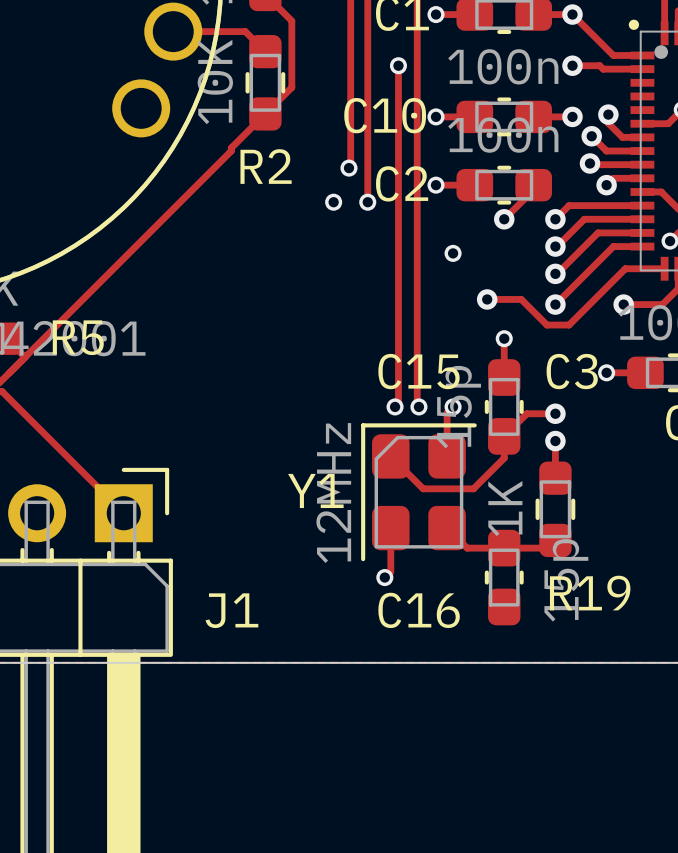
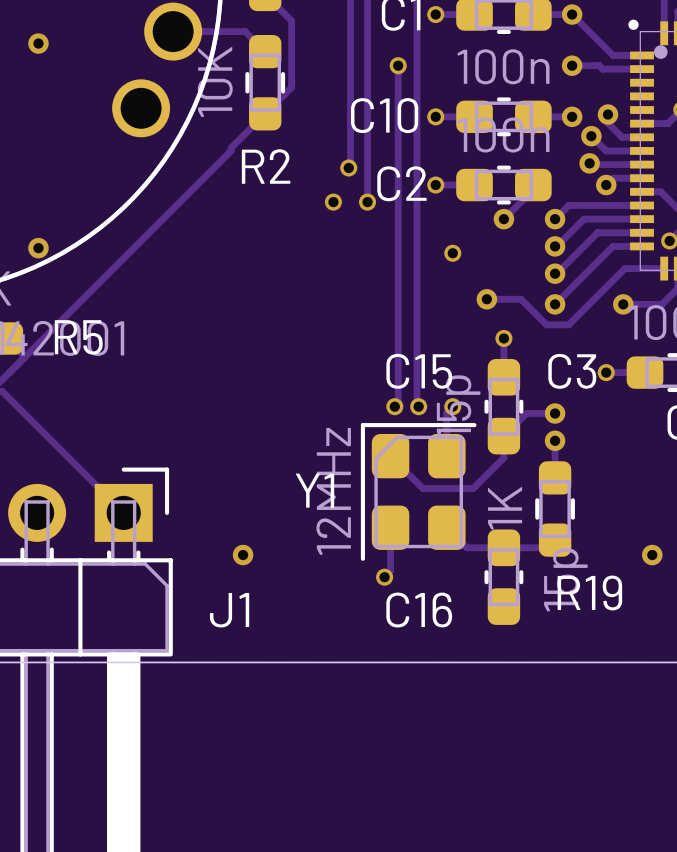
via: none -> (38, 43)
via: none -> (38, 248)
via: none -> (243, 555)
via: none -> (652, 555)

